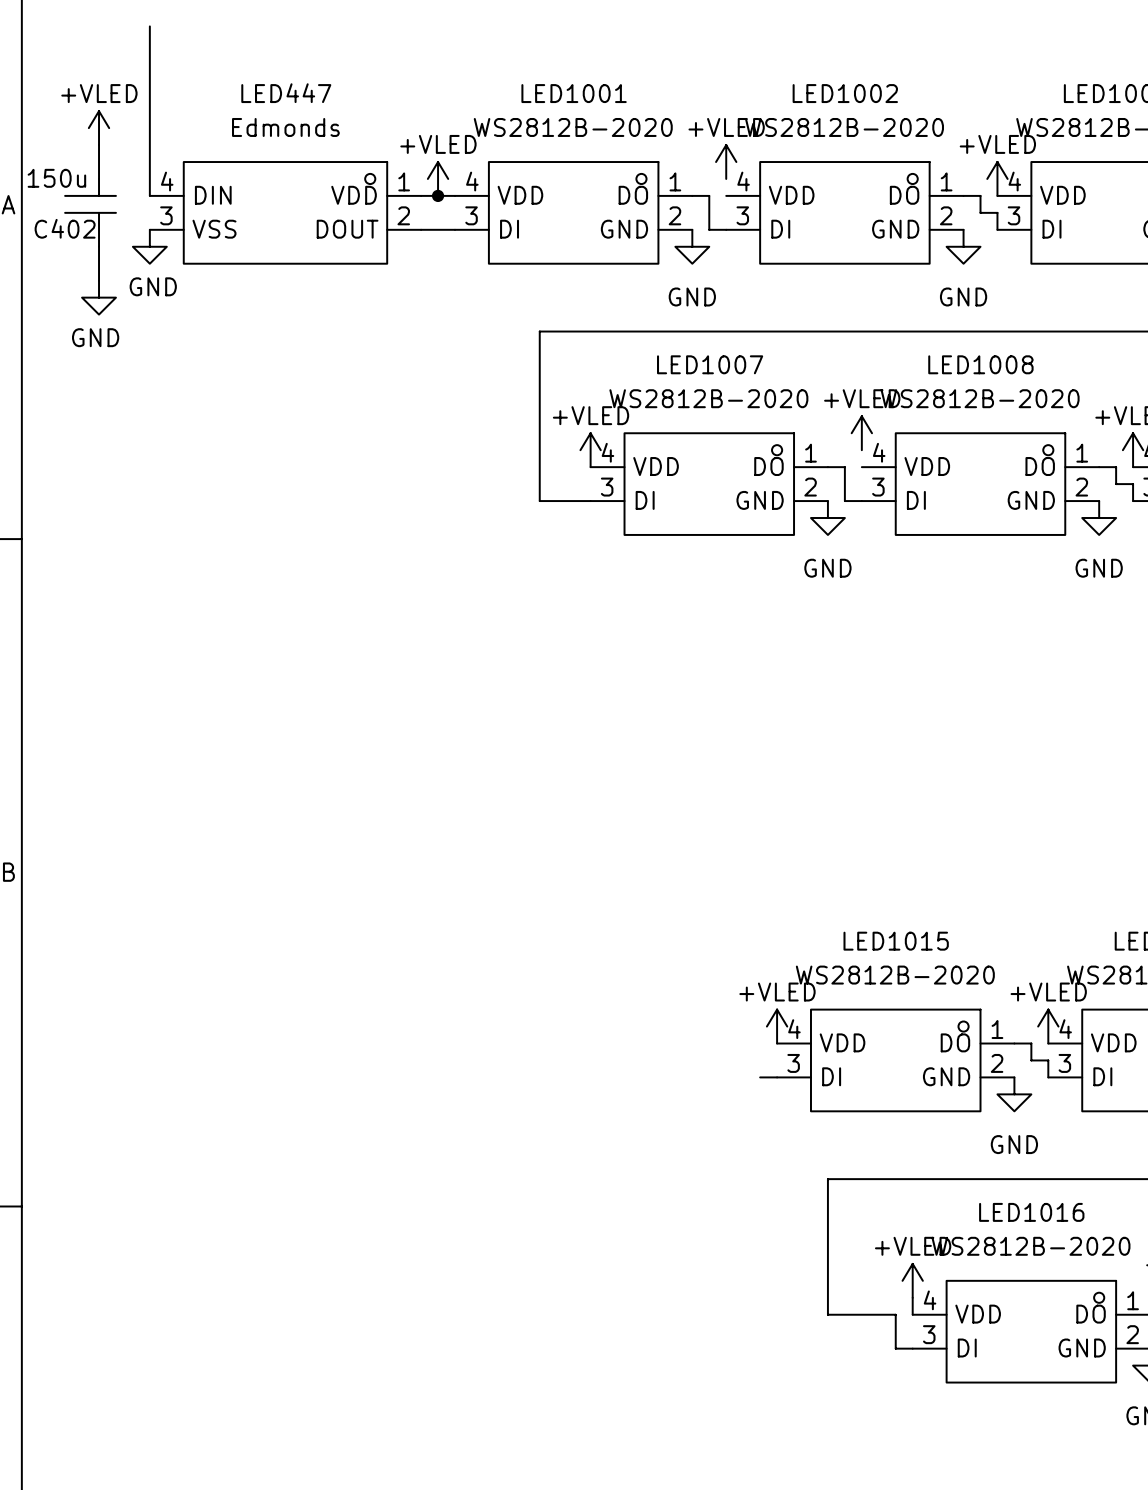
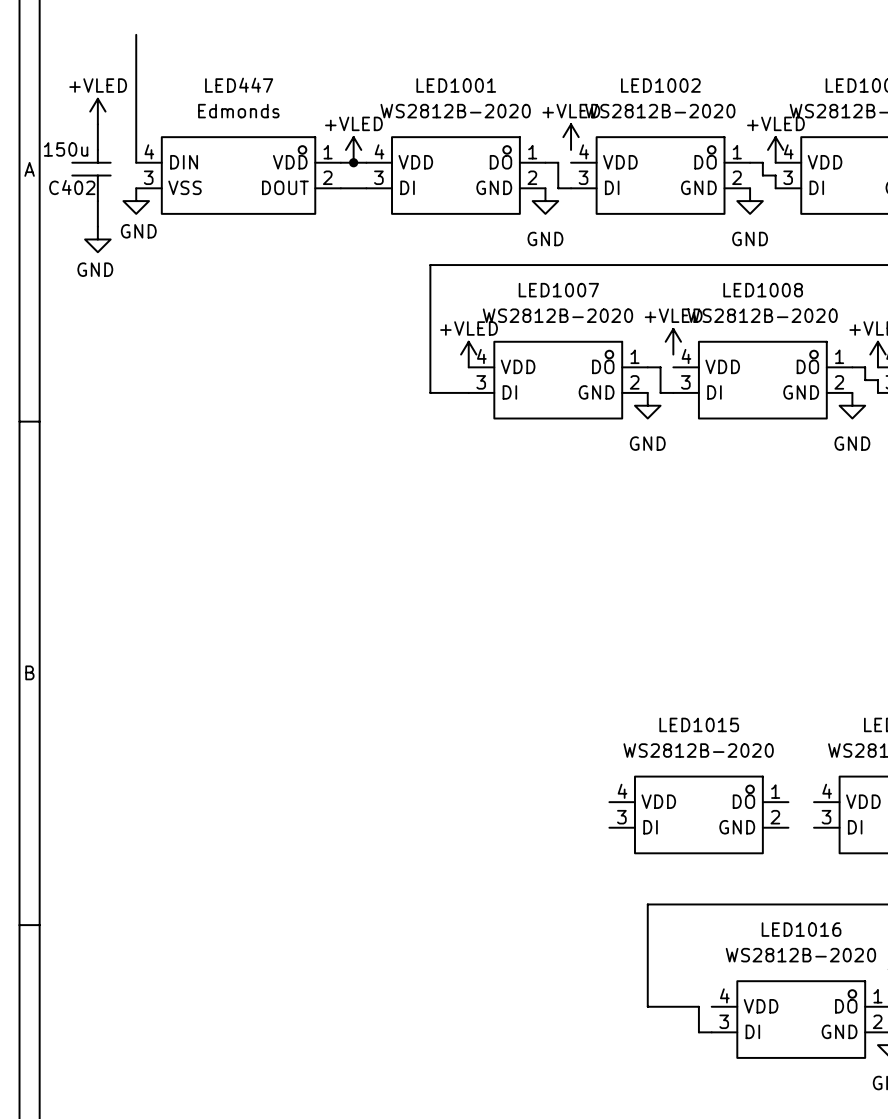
power symbol: +VLED (777, 1026) -> none
power symbol: +VLED (1048, 1026) -> none
wire: (1014, 1043) (1031, 1043) (1031, 1060) (1048, 1060) (1048, 1077) -> none
wire: (760, 1077) (777, 1077) -> none
power symbol: GND (1014, 1094) -> none
power symbol: +VLED (912, 1280) -> none
wire: (912, 1297) (912, 1314) -> none

